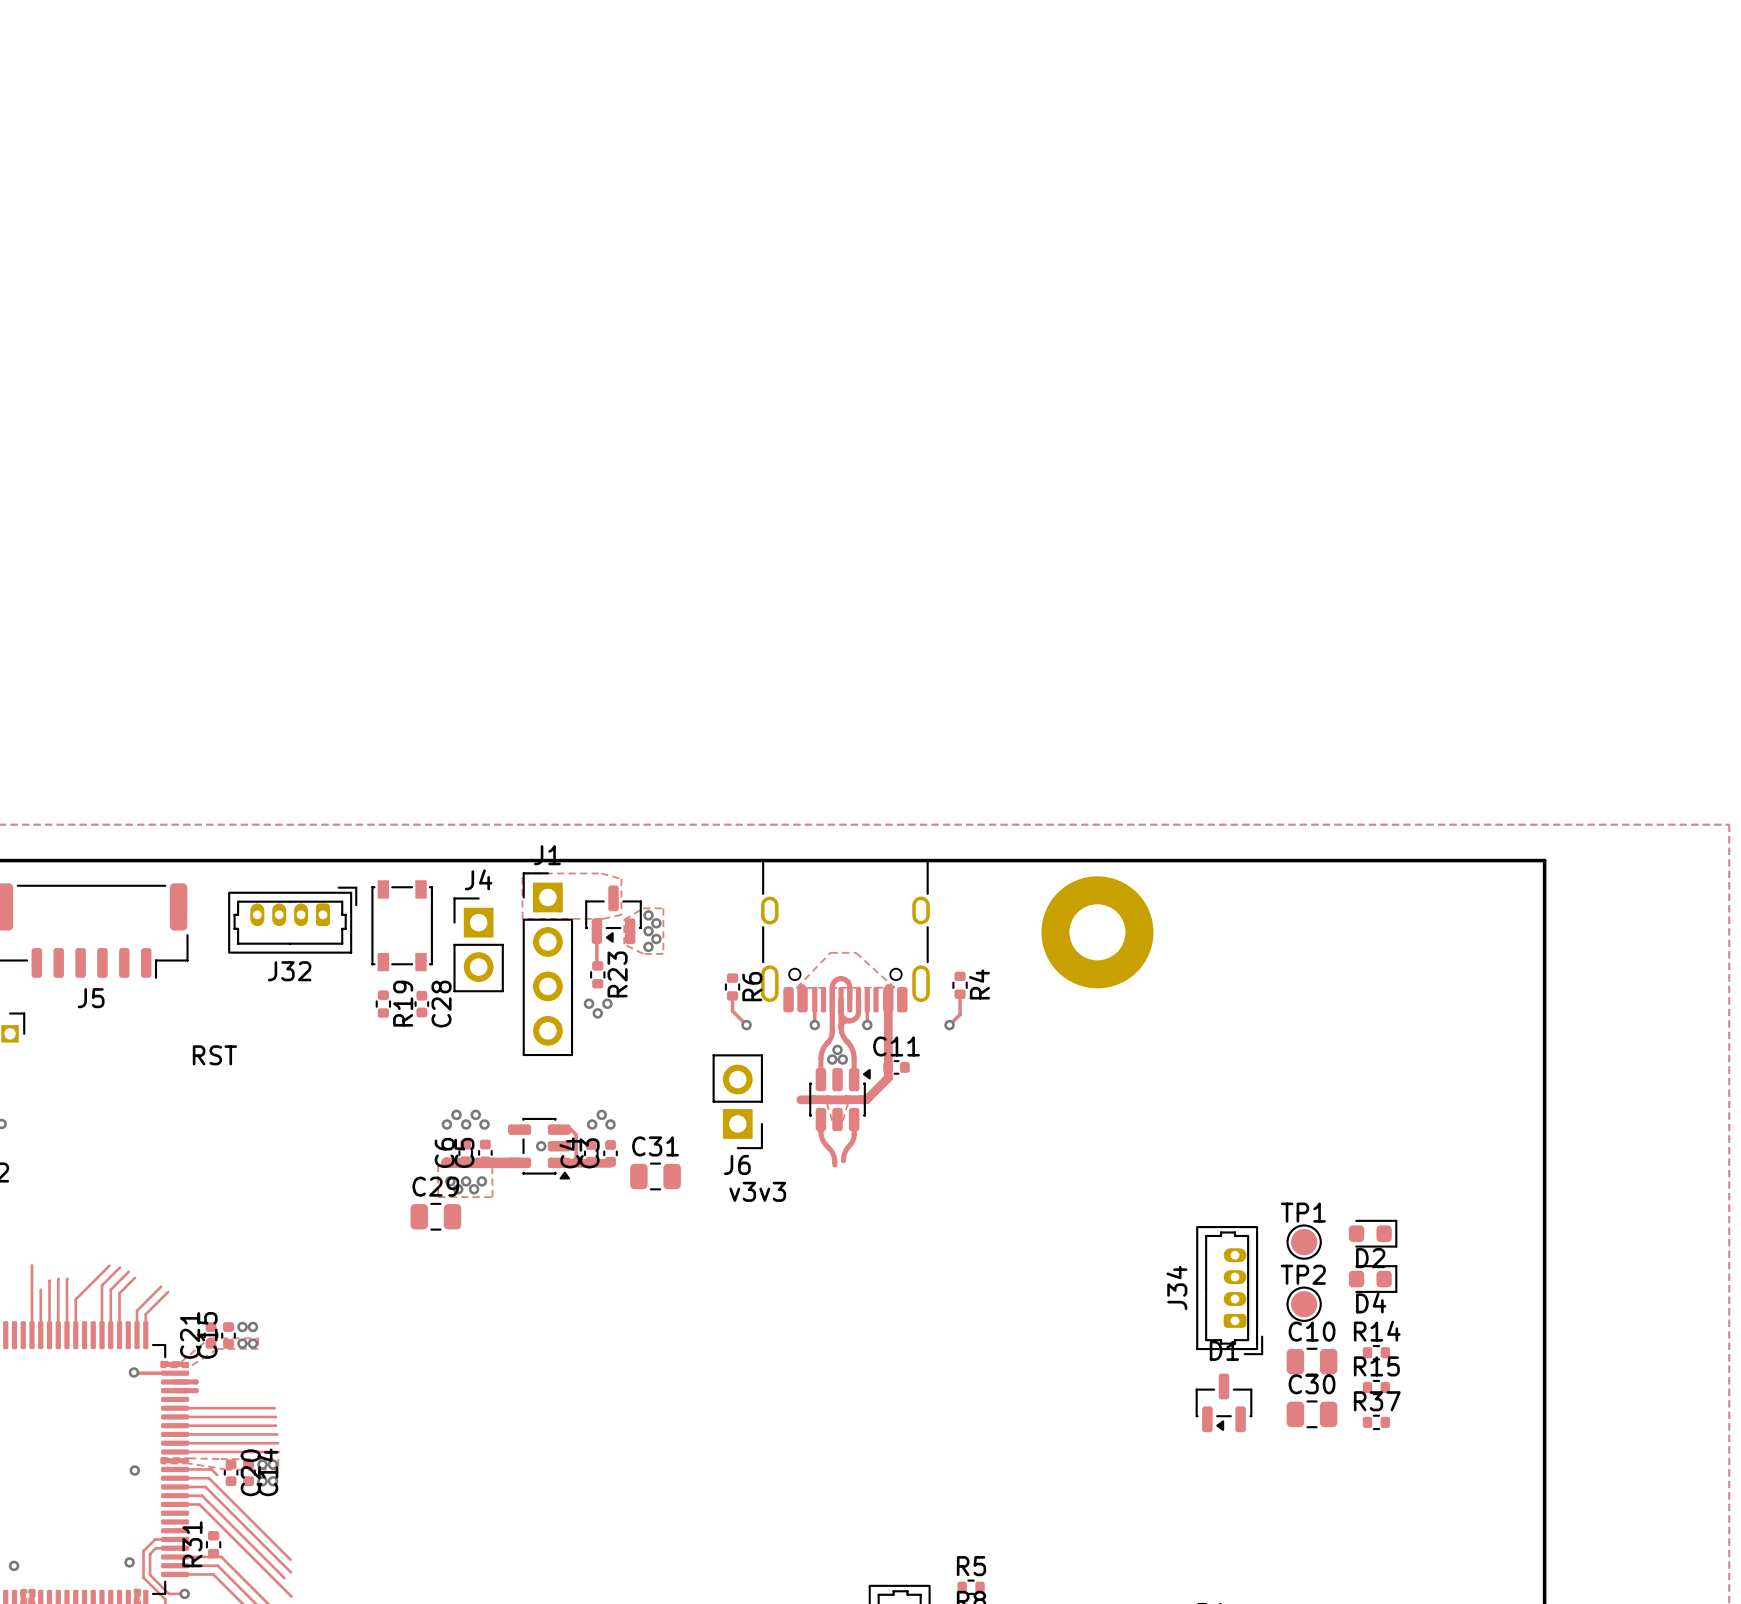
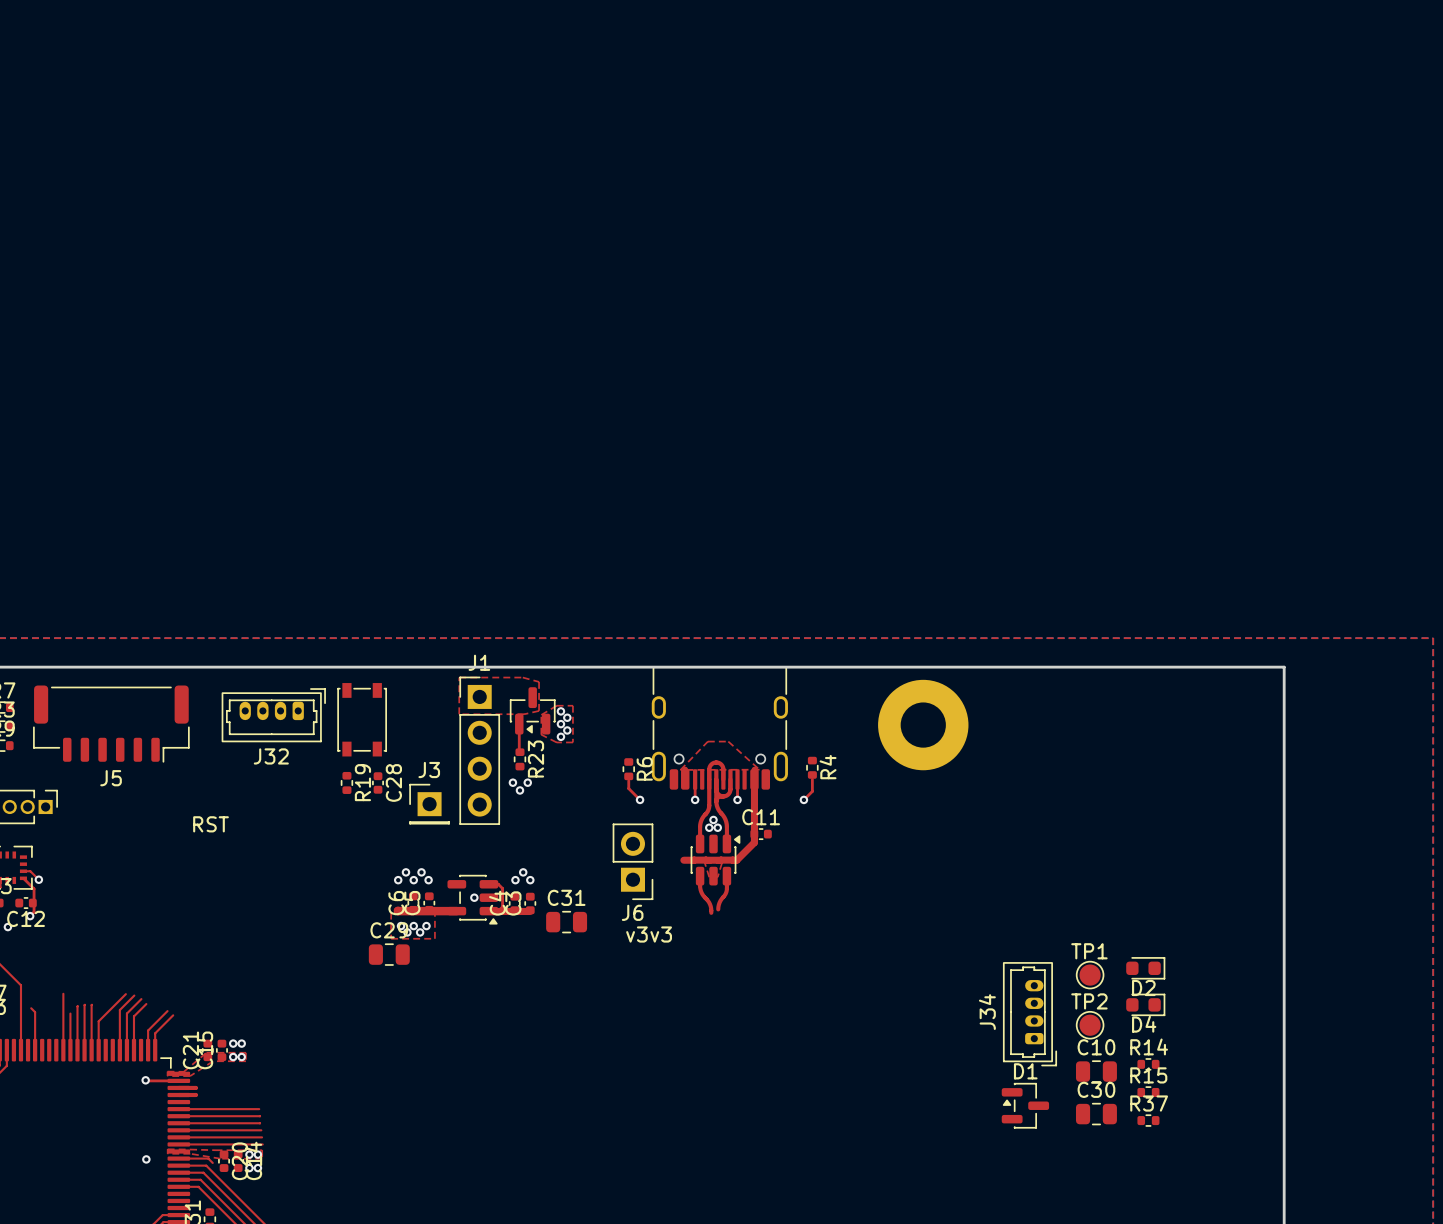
J4: (478, 944) -> none
J3: none -> (429, 804)
D1 rotation: 0° (1223, 1402) -> 90° clockwise (1025, 1105)

